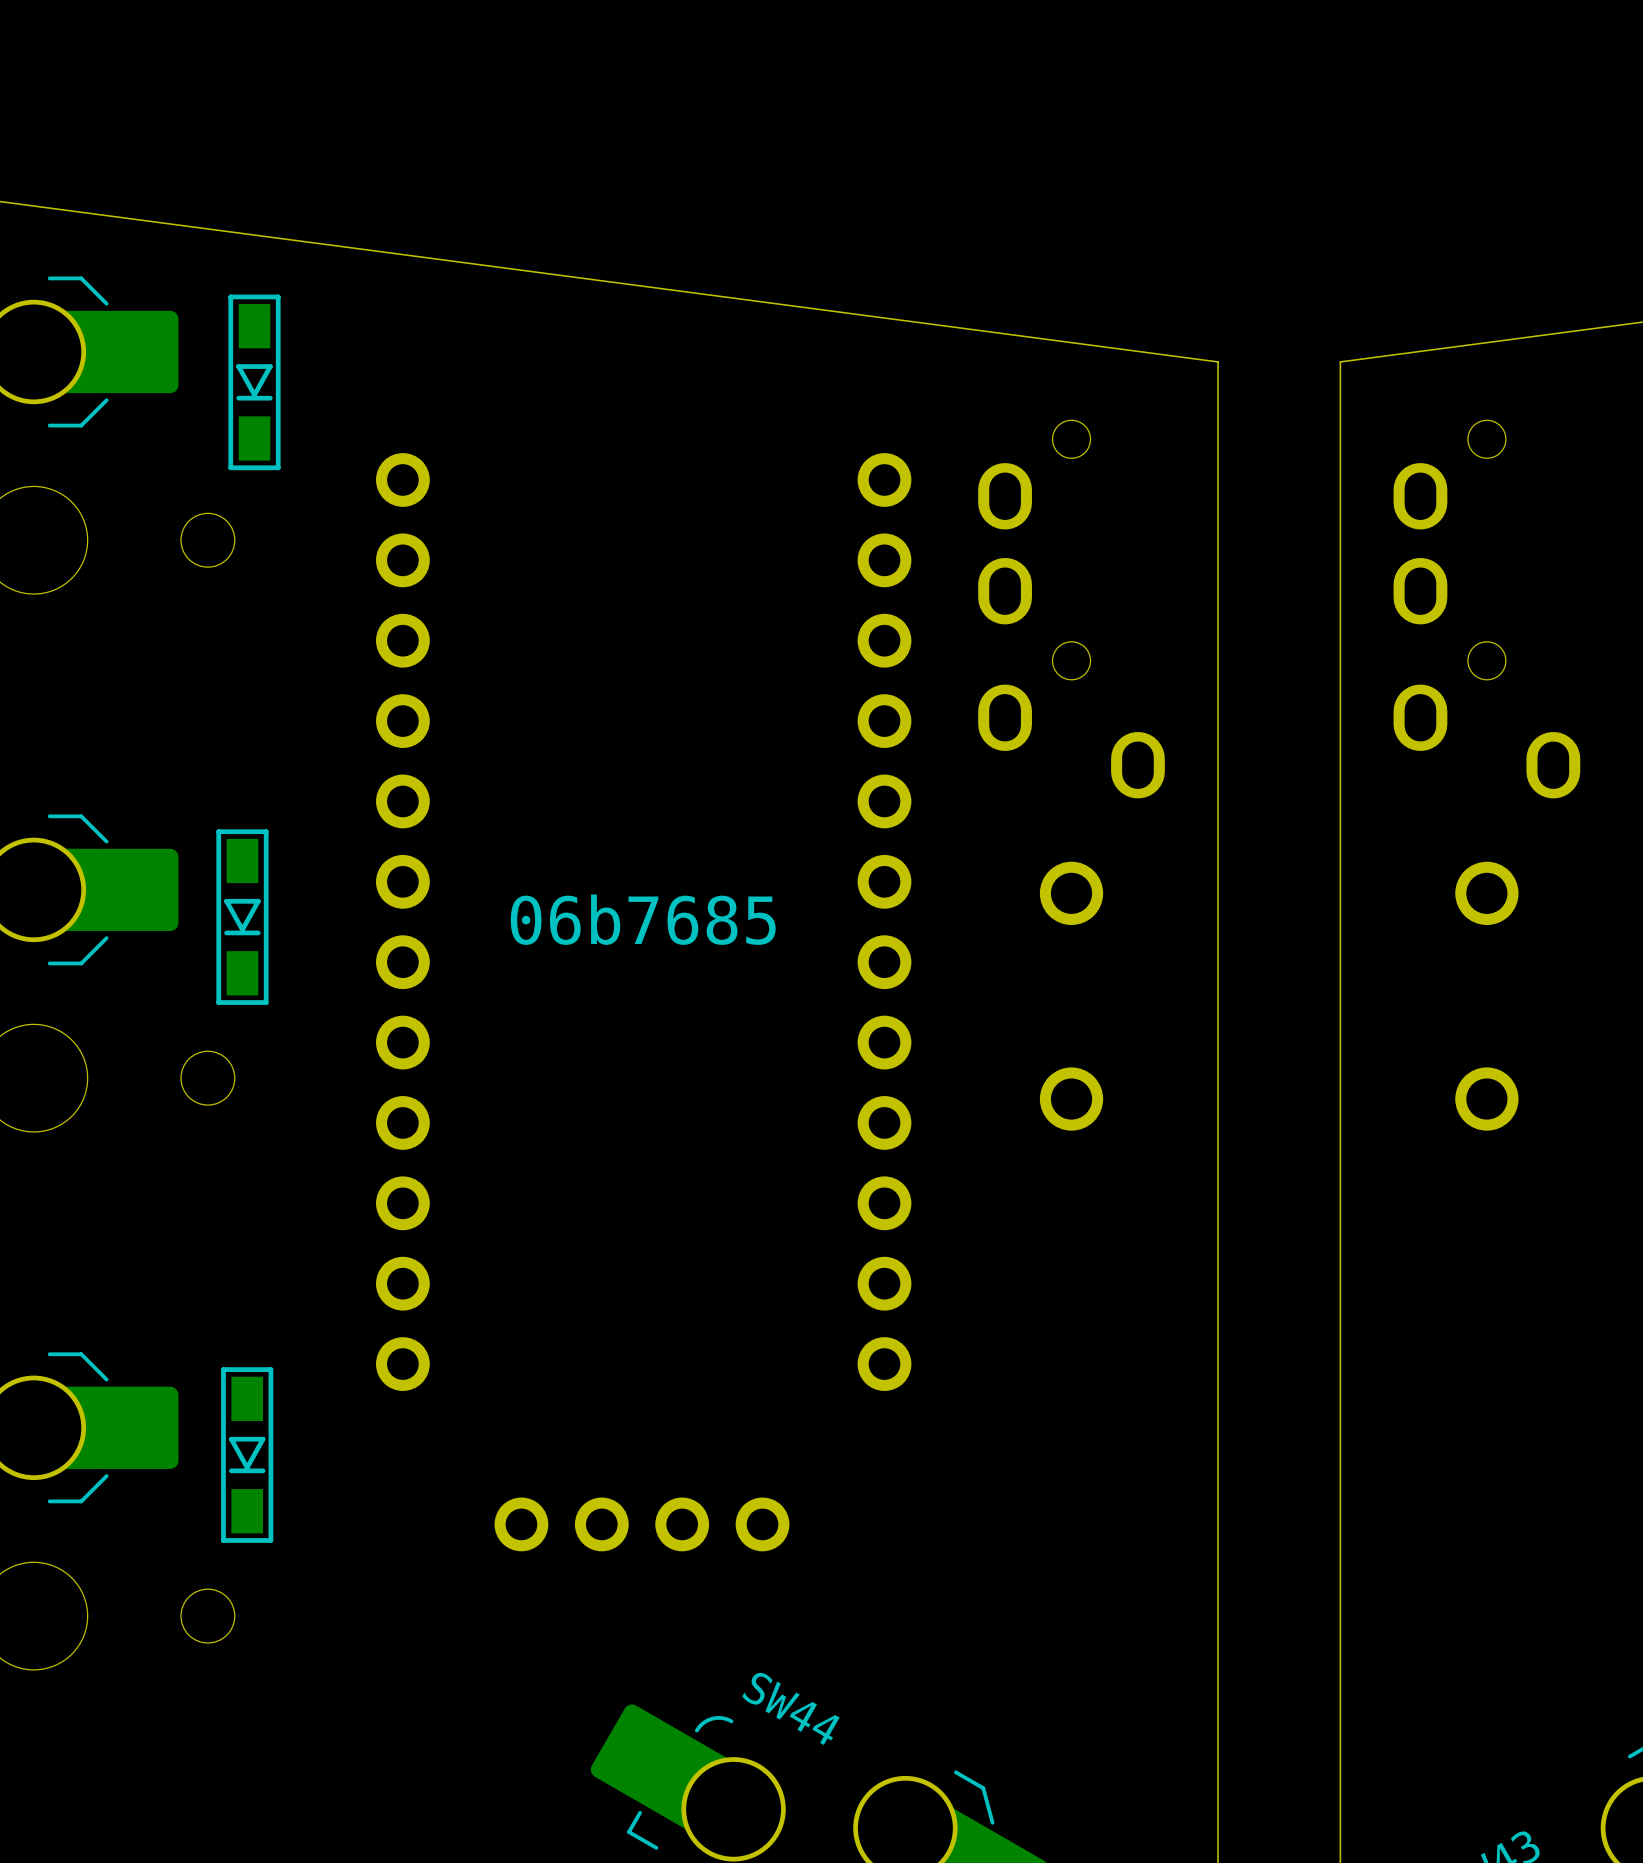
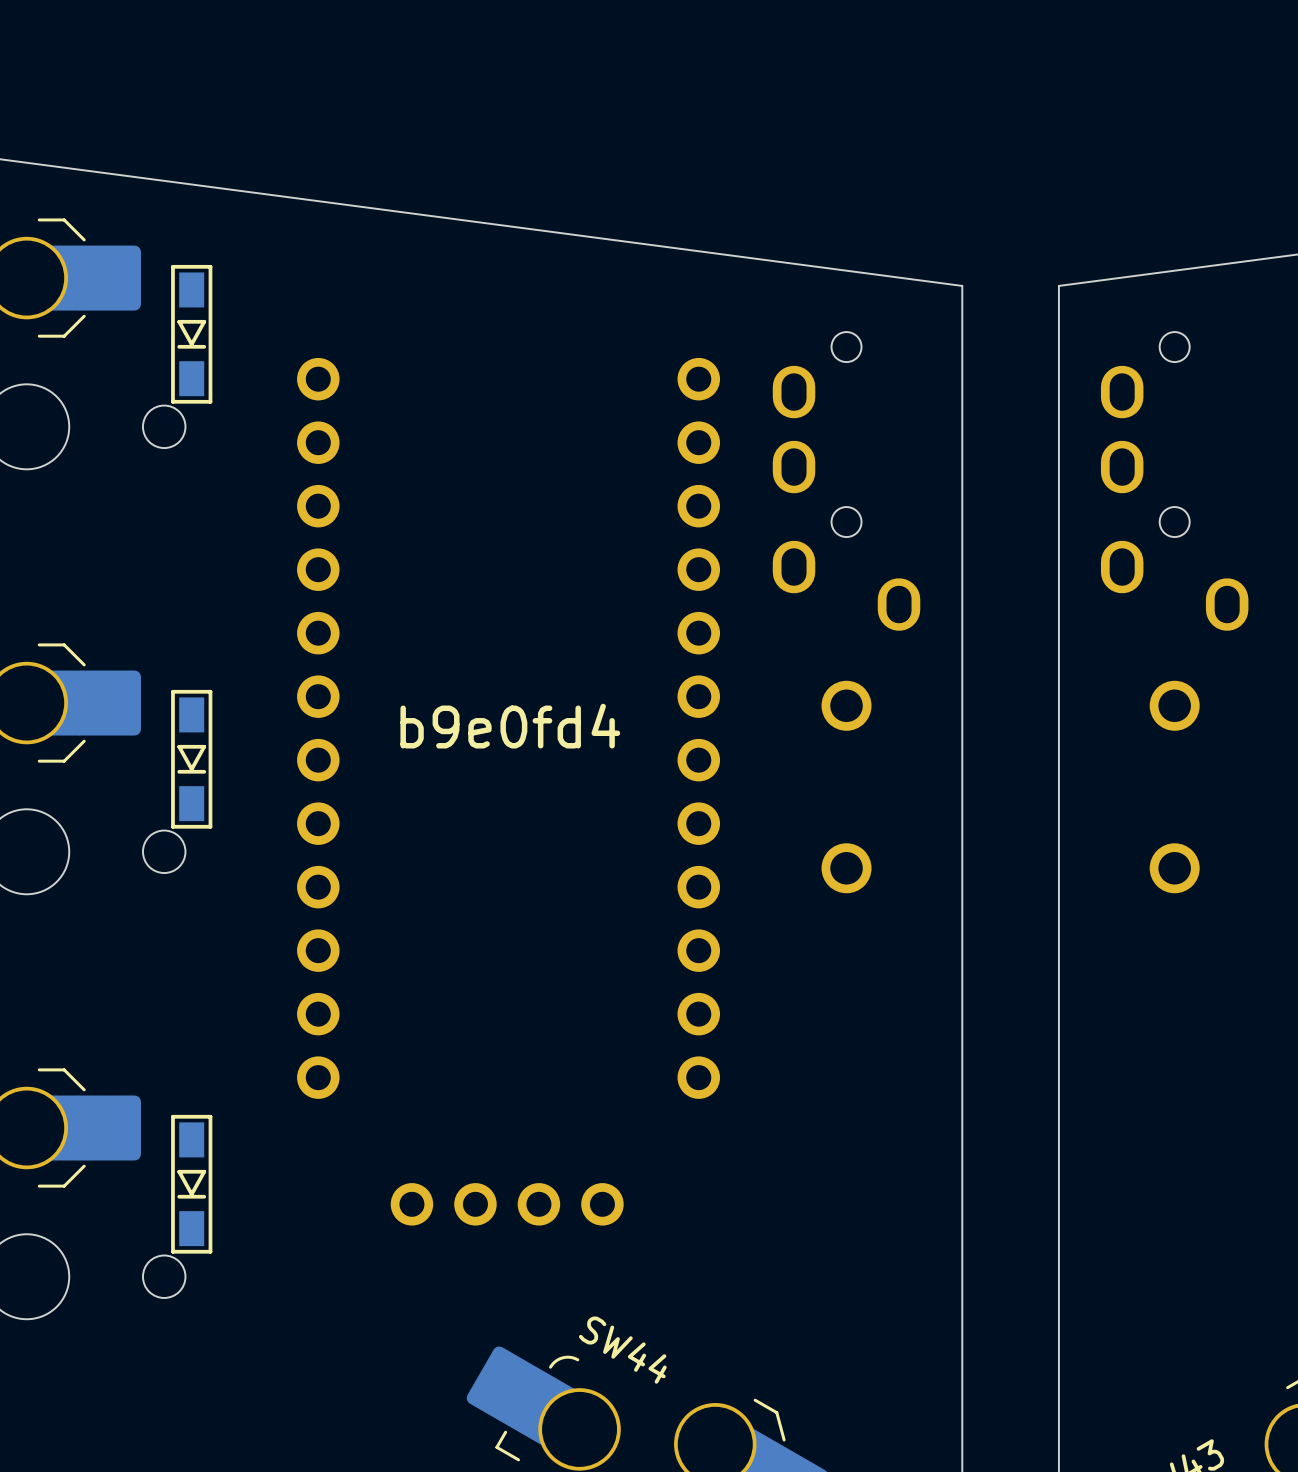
part position: (254, 382) -> (191, 334)
part position: (242, 917) -> (191, 759)
text: 06b7685 (643, 919) -> b9e0fd4 (510, 726)
part position: (247, 1455) -> (191, 1184)

